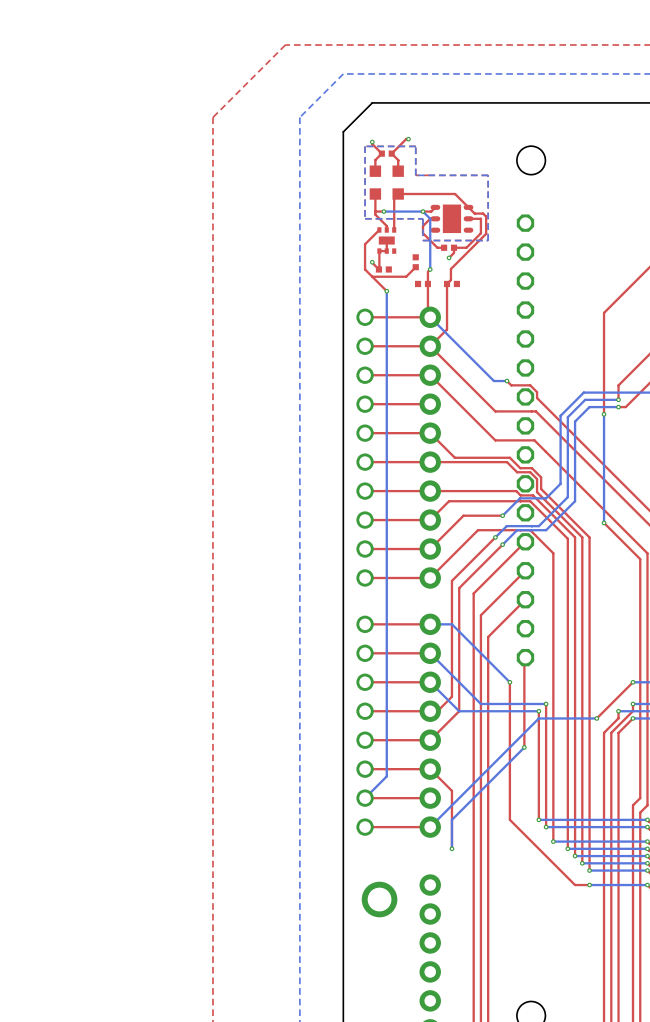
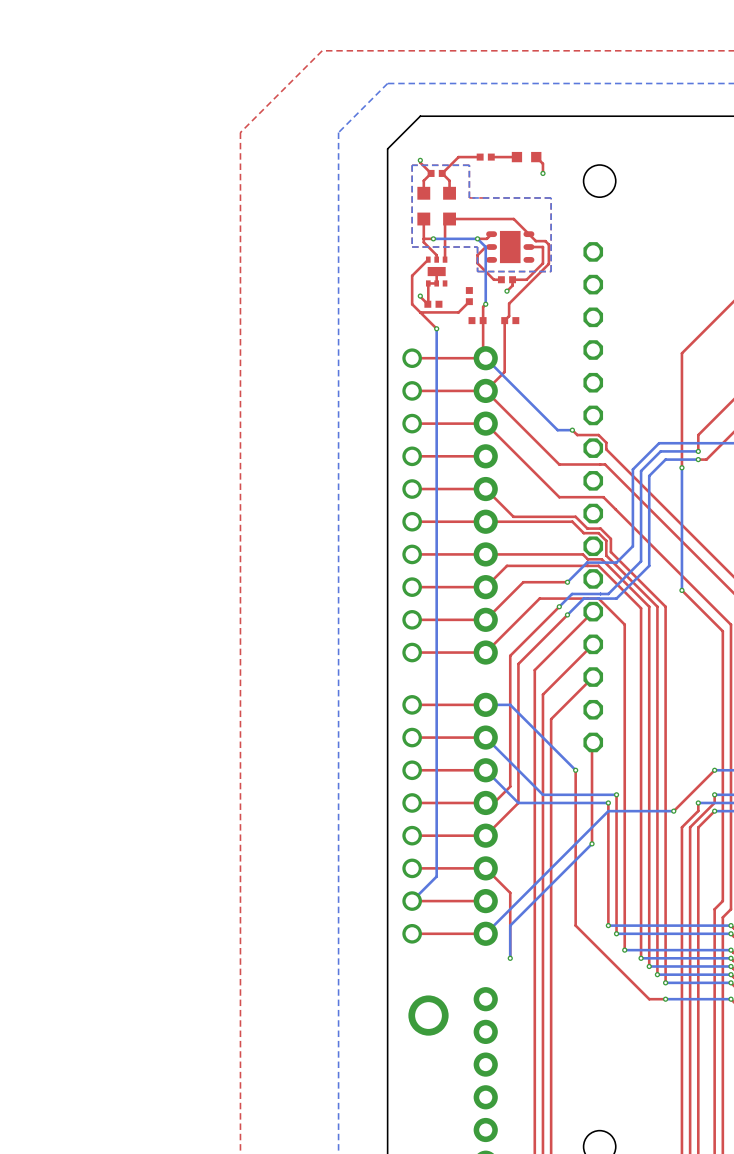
via: (408, 139) -> none
top track: none -> (480, 157) (461, 157)
part: none -> (485, 157)
top track: none -> (516, 157) (491, 157)
part: none -> (526, 157)
top track: none -> (536, 157) (542, 163) (542, 173)
via: none -> (542, 173)

